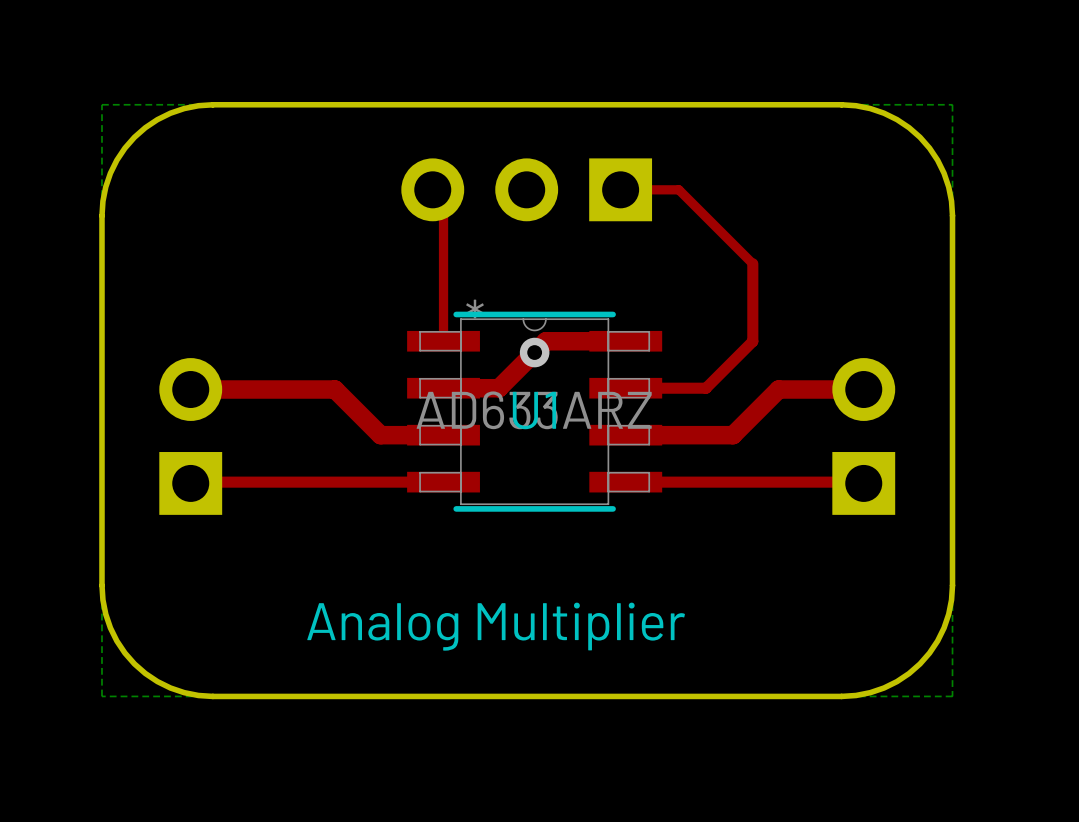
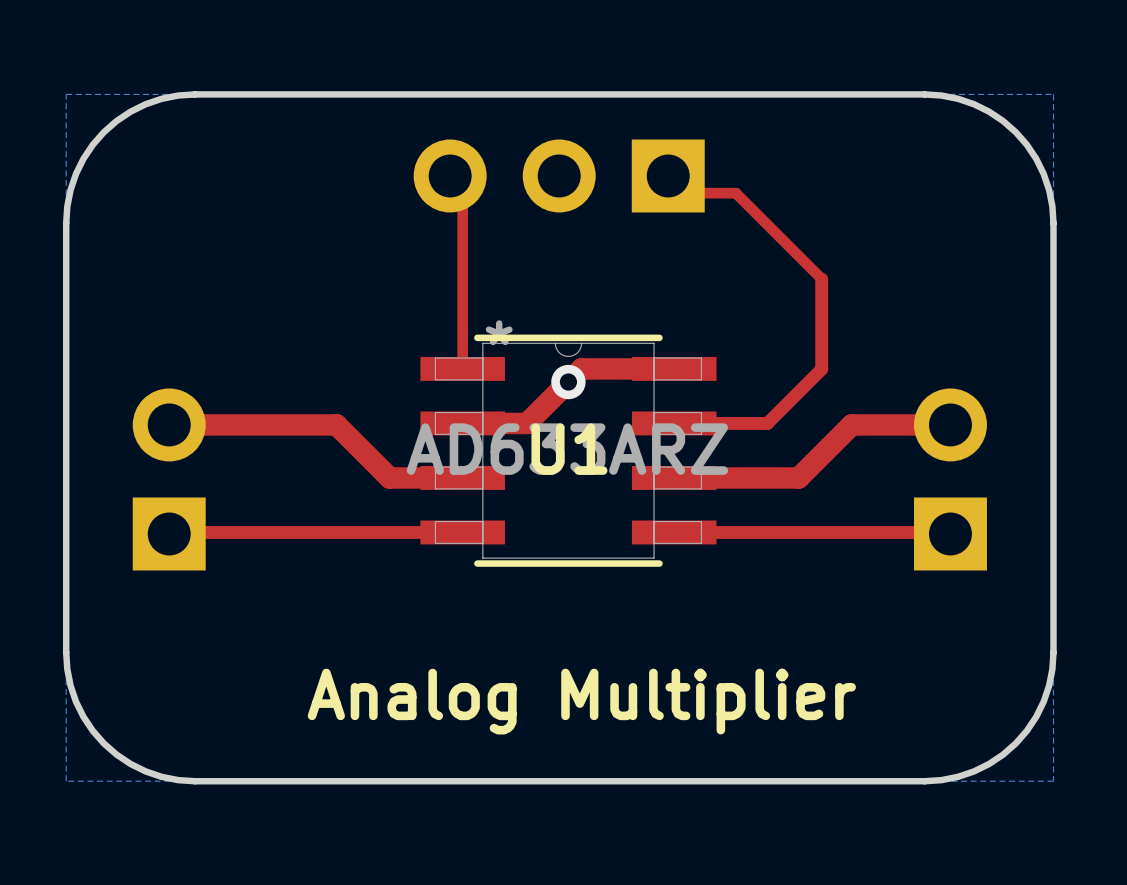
part position: (526, 189) -> (559, 175)

